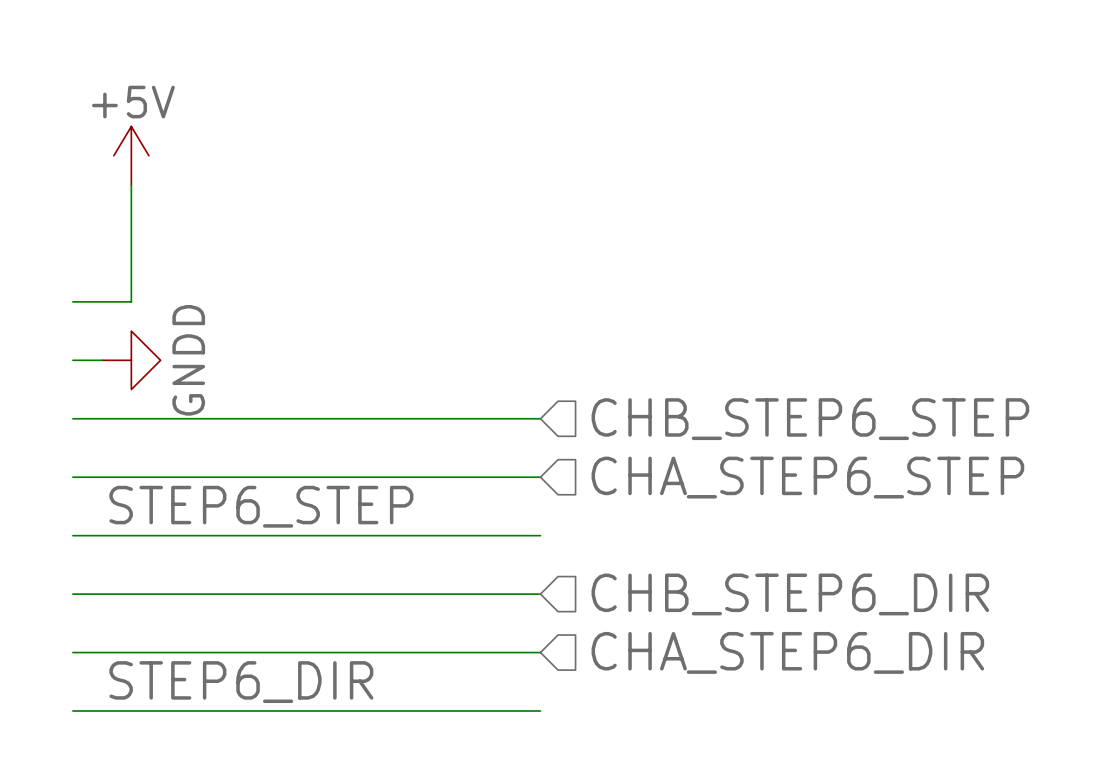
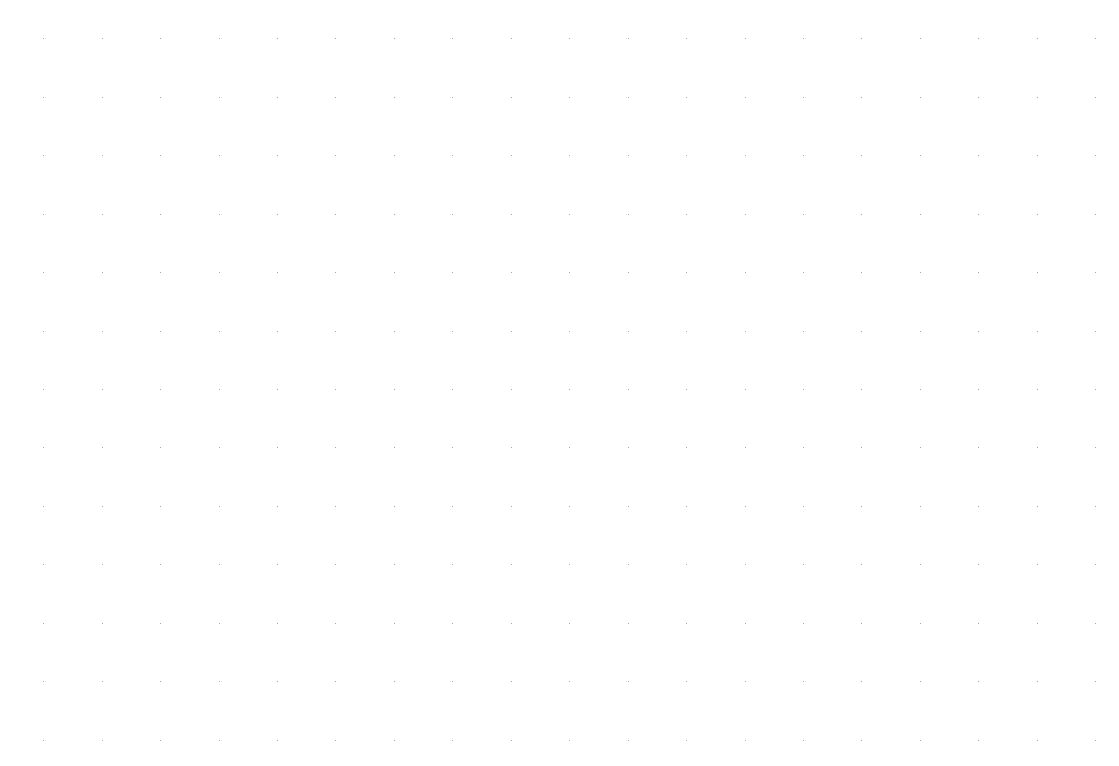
power symbol: +5V (131, 155) -> none
wire: (131, 184) (131, 301) (72, 301) -> none
wire: (72, 360) (102, 360) -> none
power symbol: GNDD (131, 360) -> none
wire: (72, 418) (540, 418) -> none
hierarchical label: CHB_STEP6_STEP (810, 419) -> none
wire: (72, 477) (540, 477) -> none
hierarchical label: CHA_STEP6_STEP (807, 477) -> none
label: STEP6_STEP (261, 506) -> none
wire: (72, 535) (540, 535) -> none
wire: (72, 594) (540, 594) -> none
hierarchical label: CHB_STEP6_DIR (790, 594) -> none
wire: (72, 652) (540, 652) -> none
hierarchical label: CHA_STEP6_DIR (787, 652) -> none
label: STEP6_DIR (241, 682) -> none
wire: (72, 711) (540, 711) -> none

